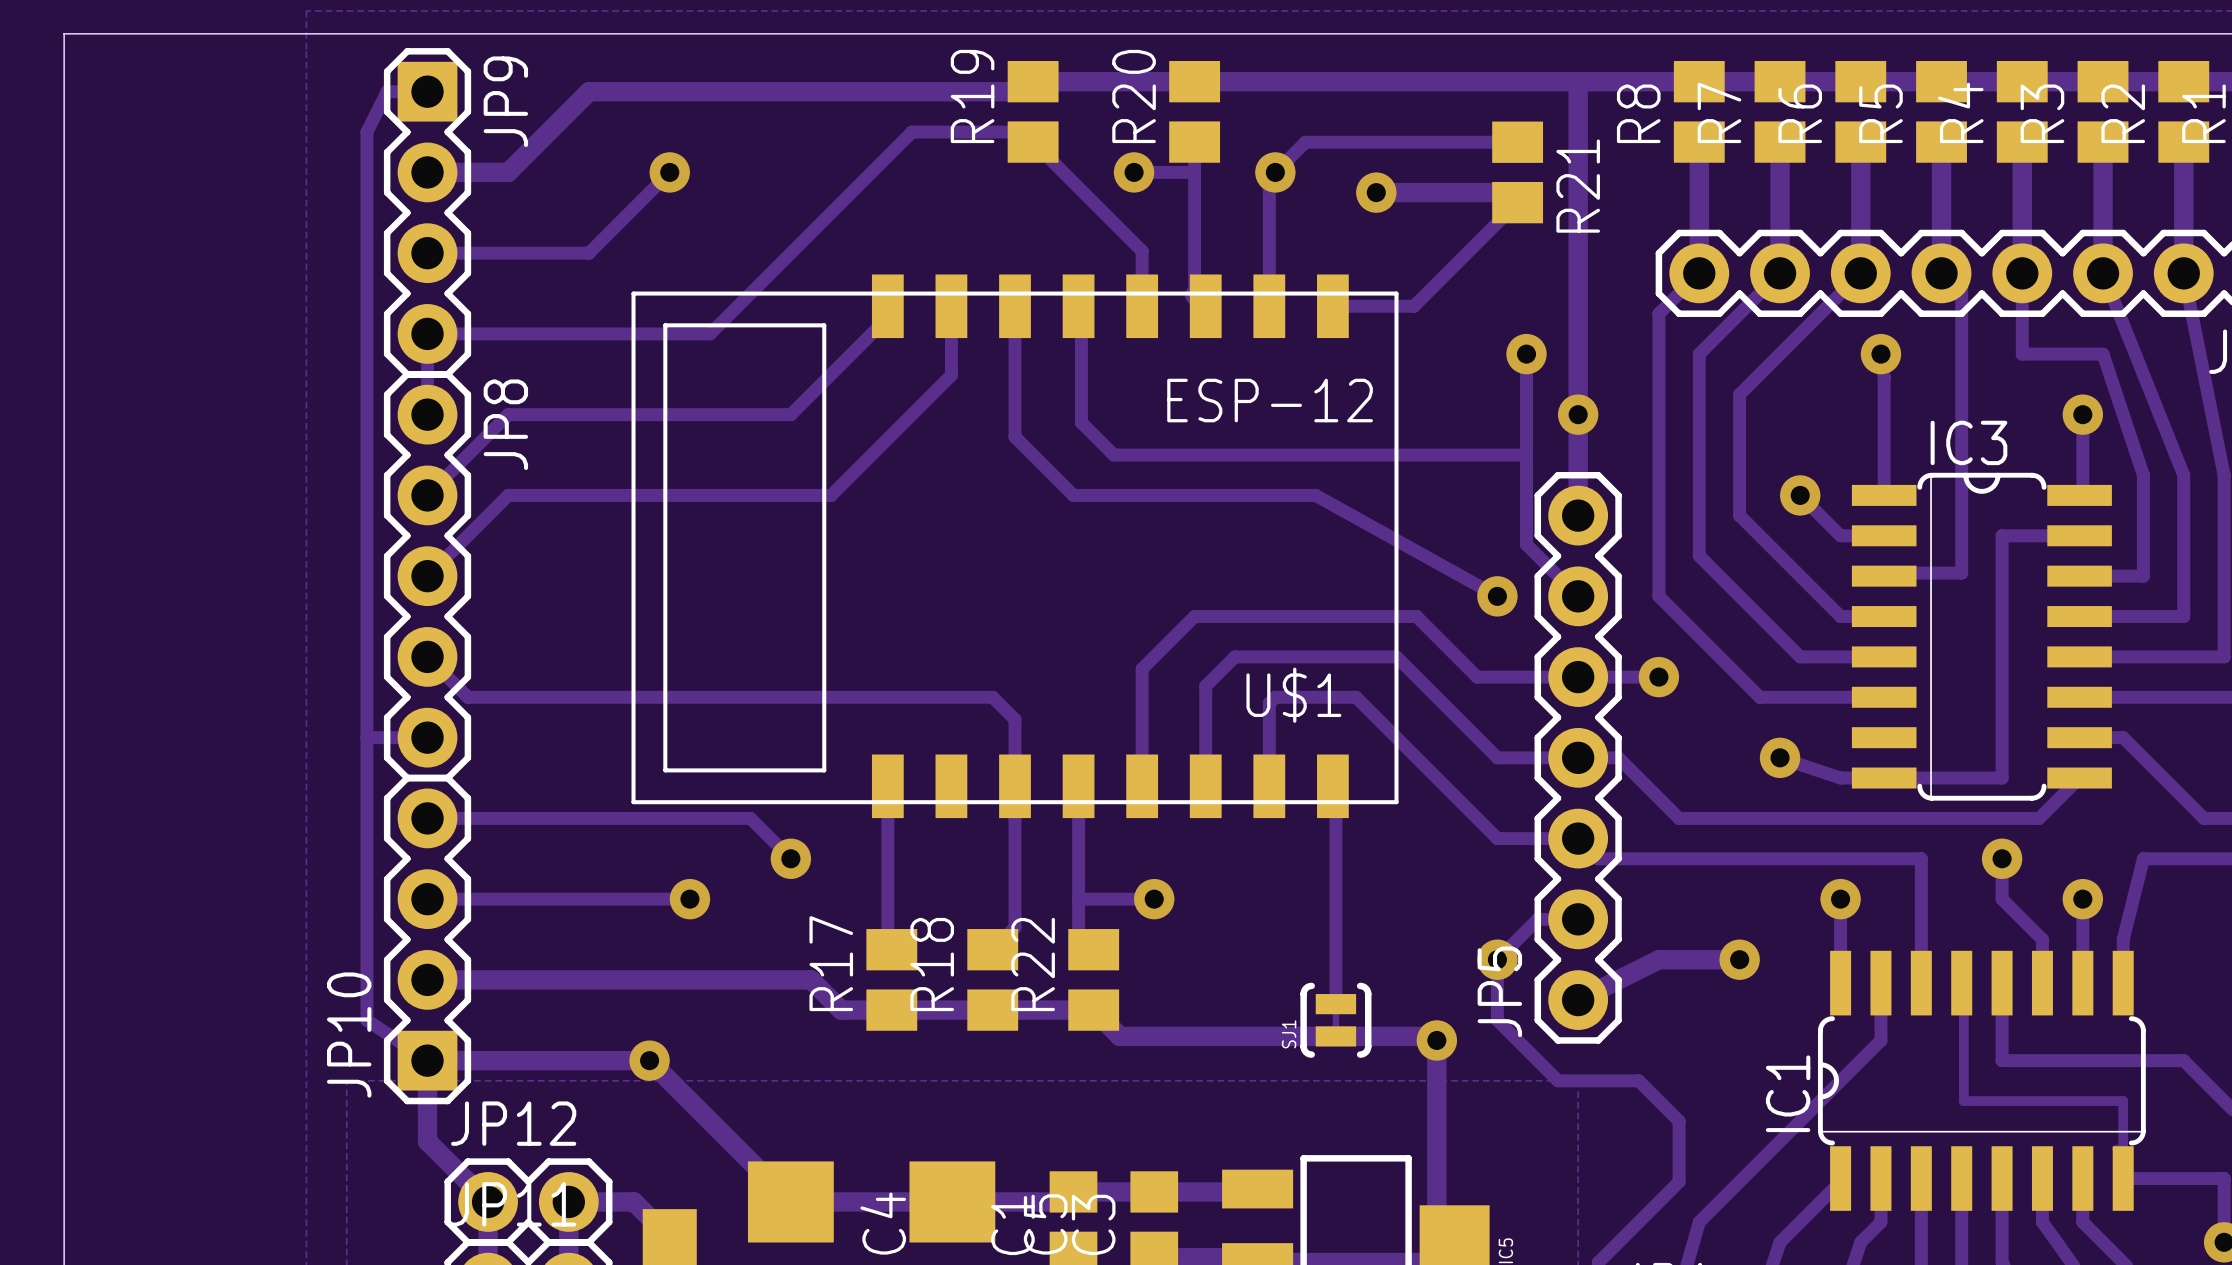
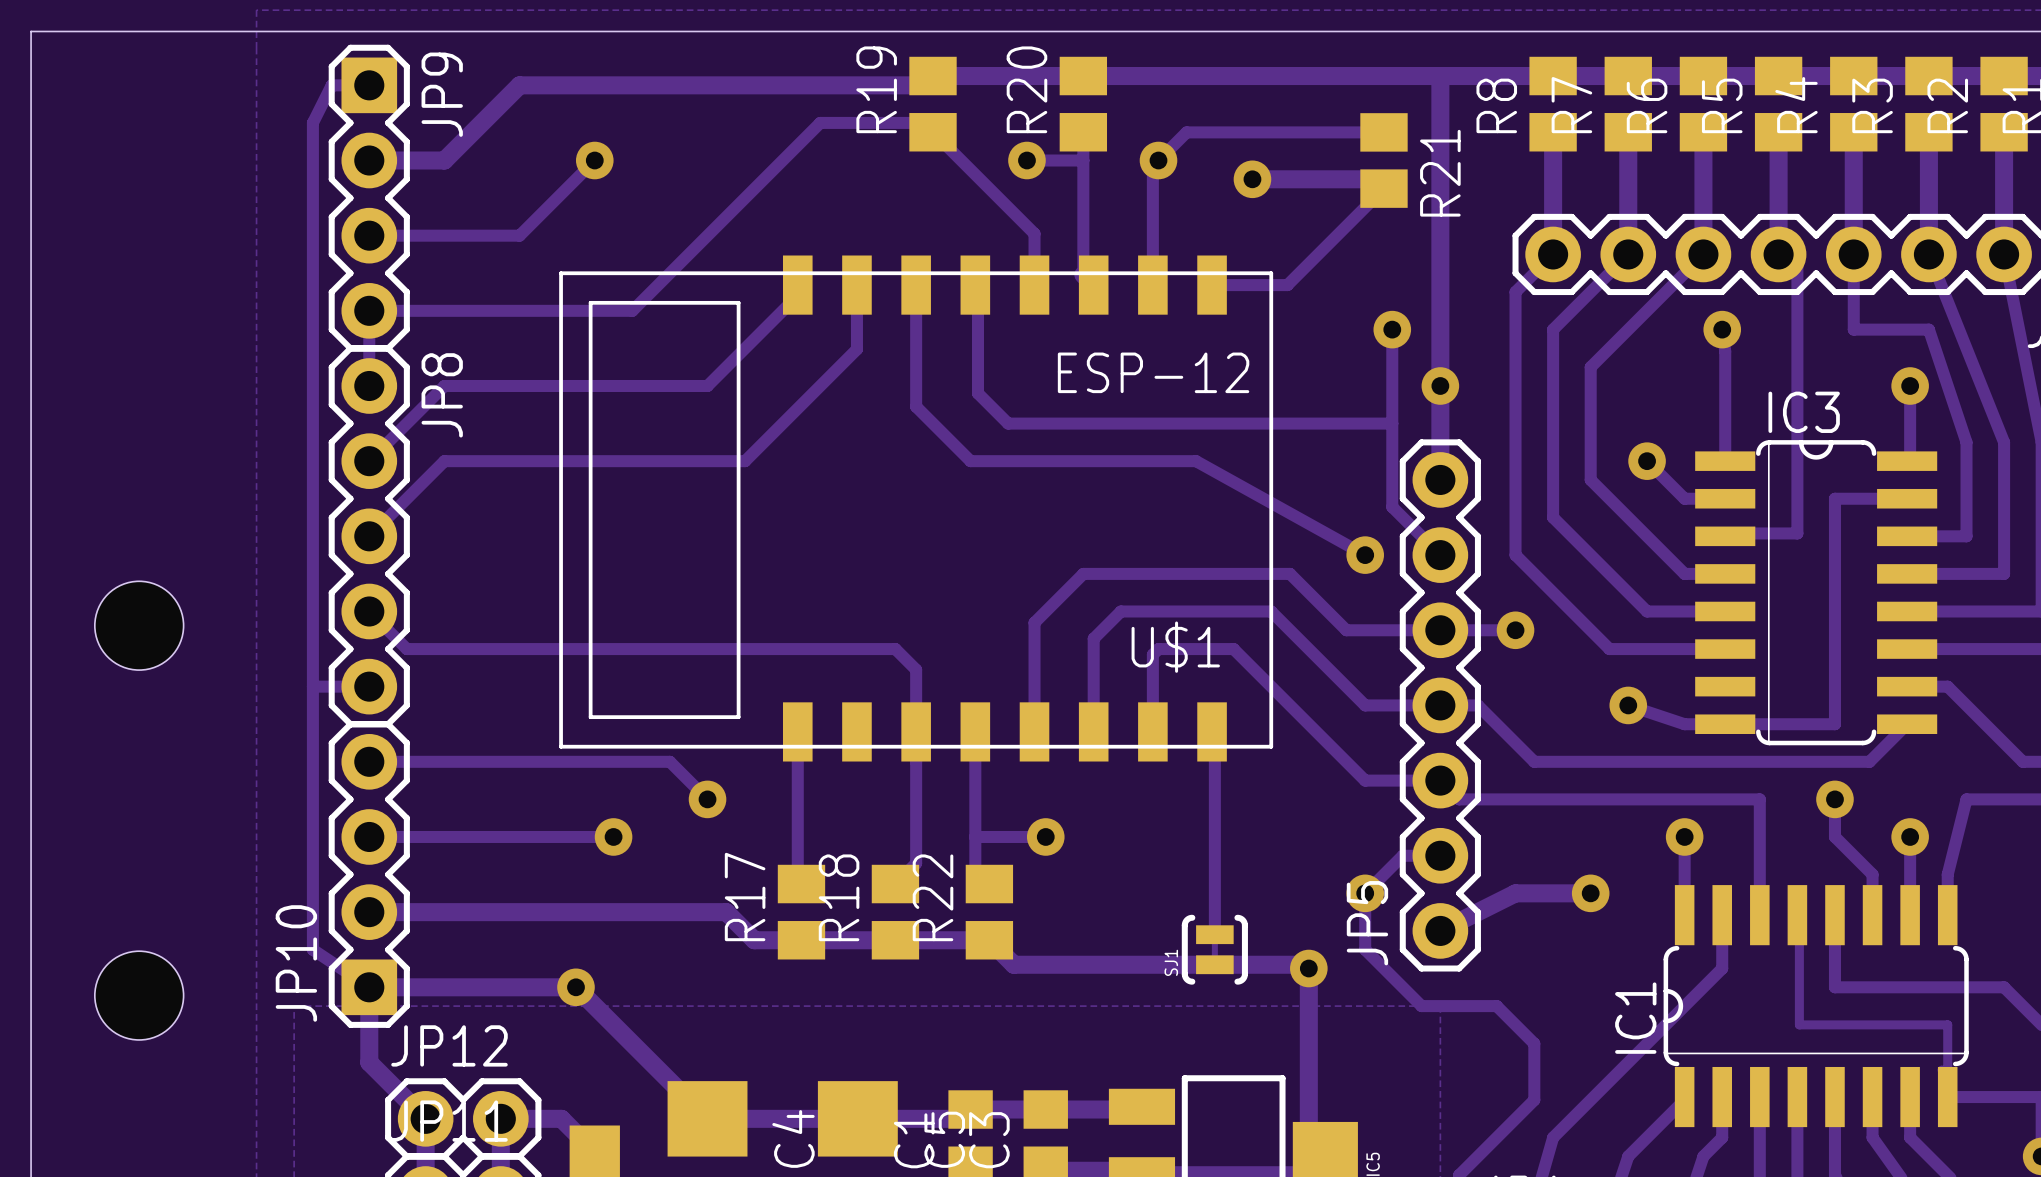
hole: none -> (139, 625)
hole: none -> (139, 995)

